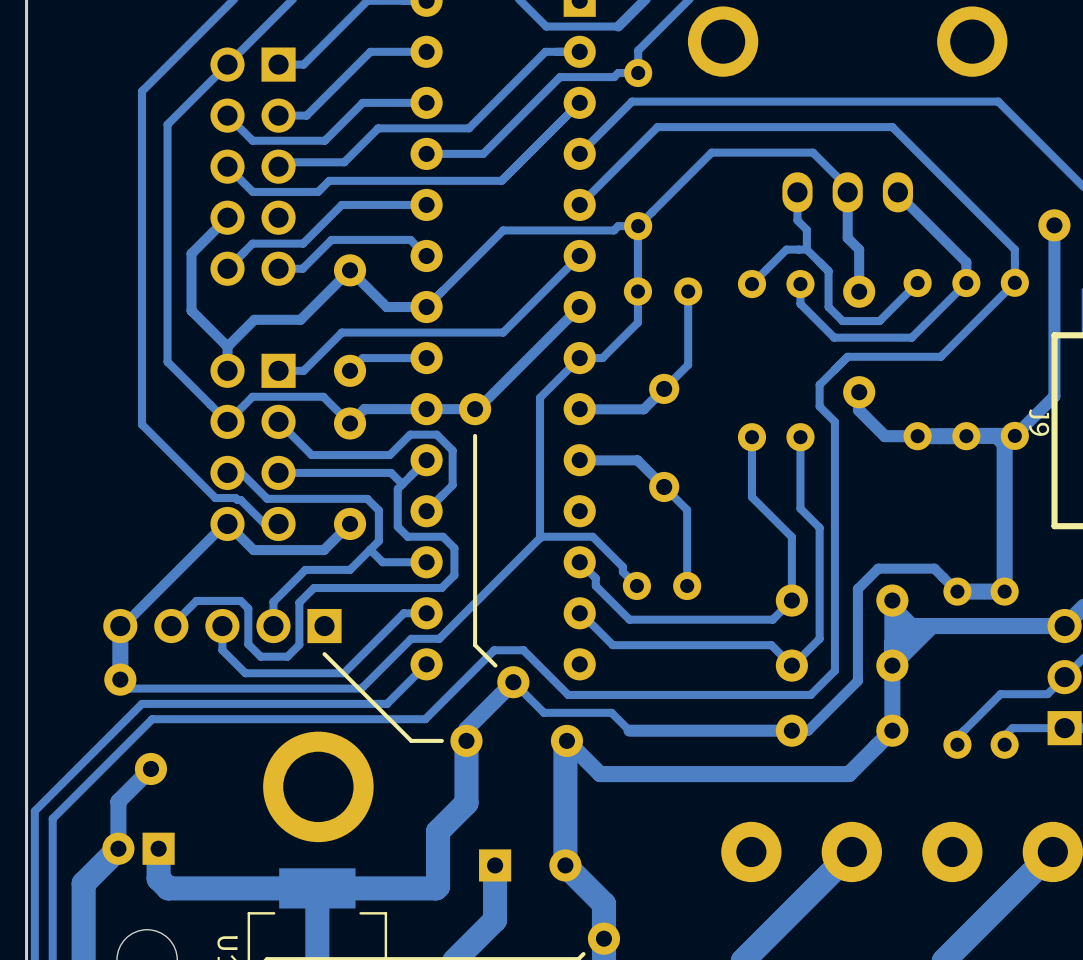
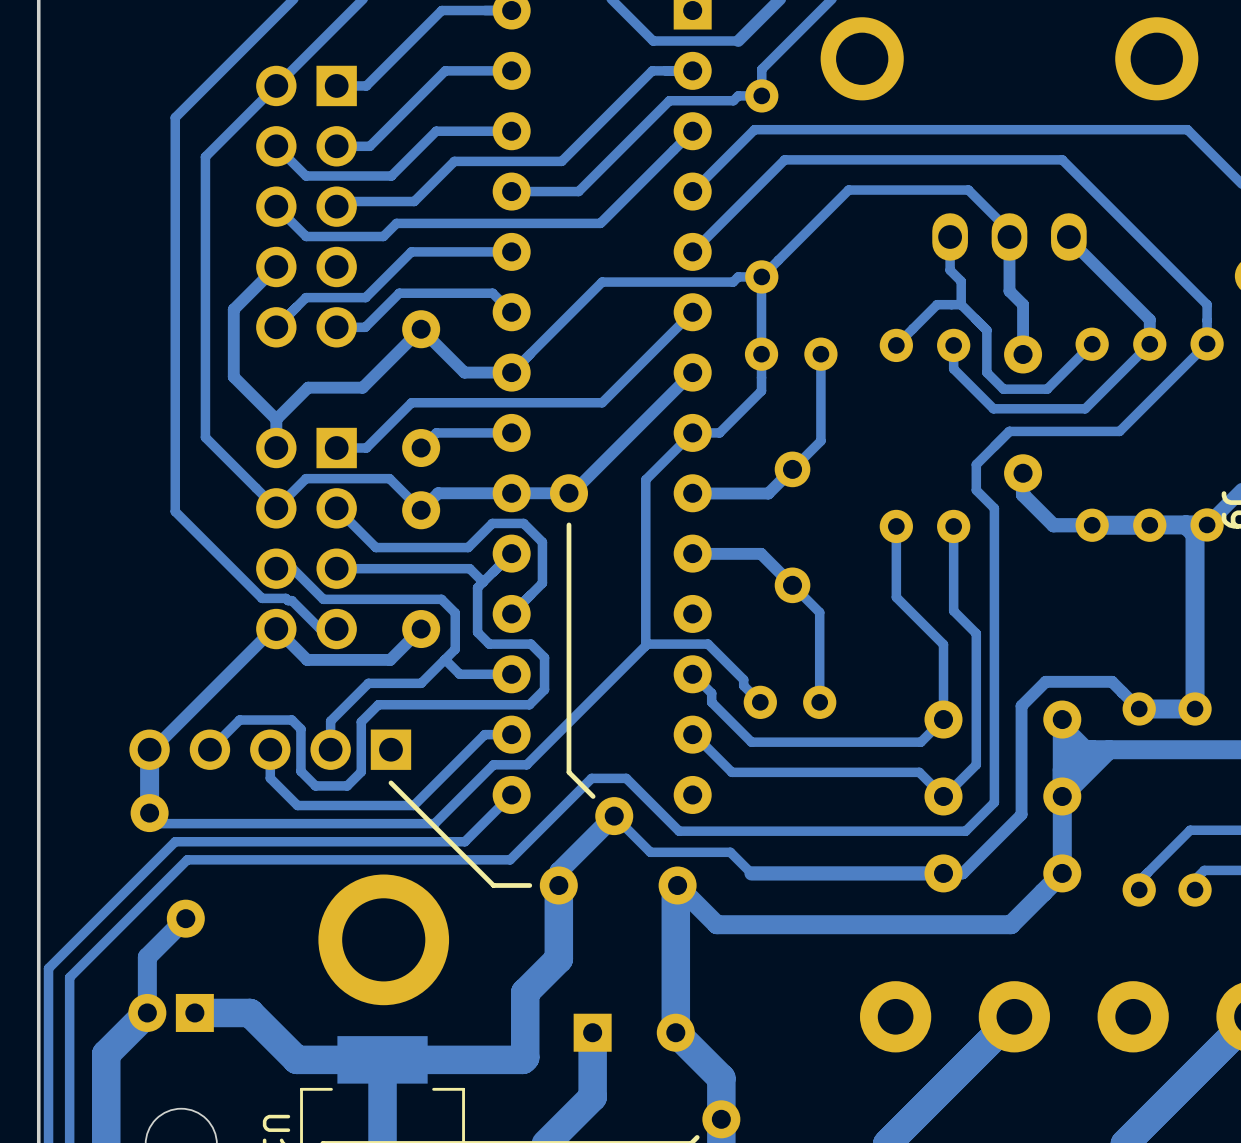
track: (158, 848) (158, 878) (168, 888) (244, 888) -> (194, 1012) (249, 1012) (296, 1059)

